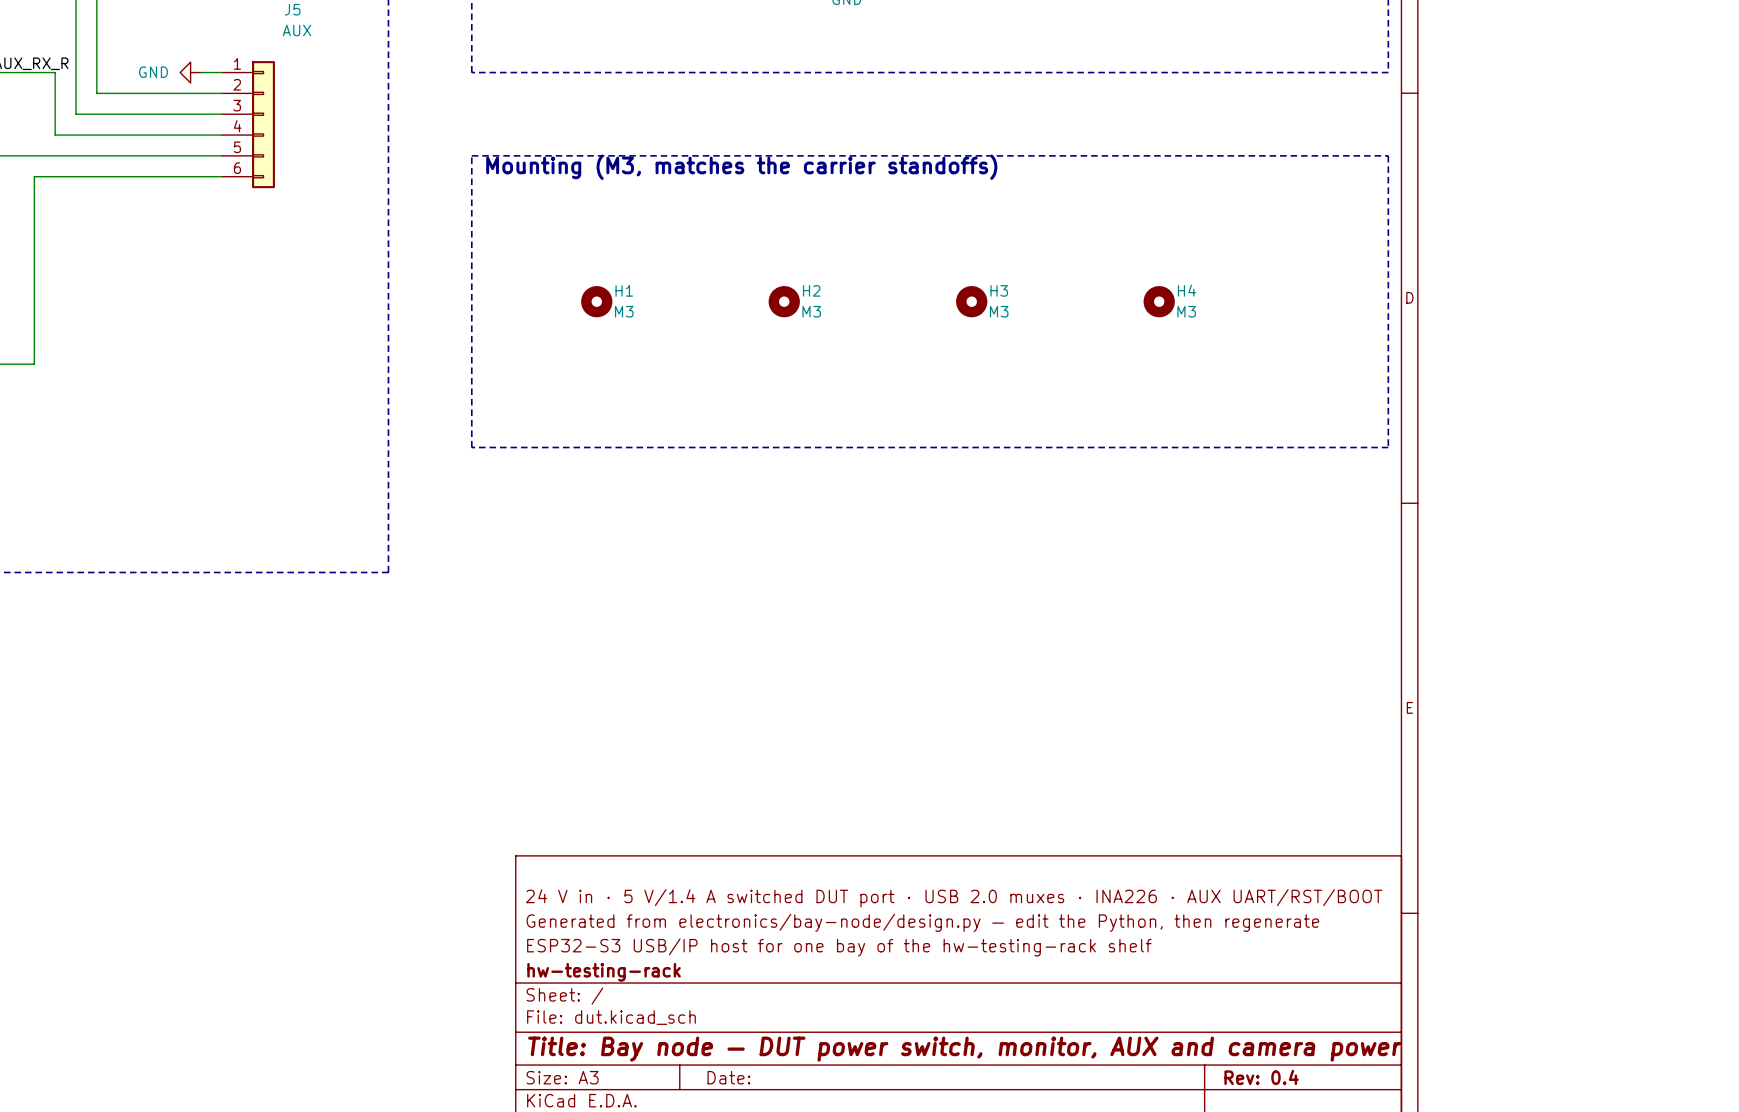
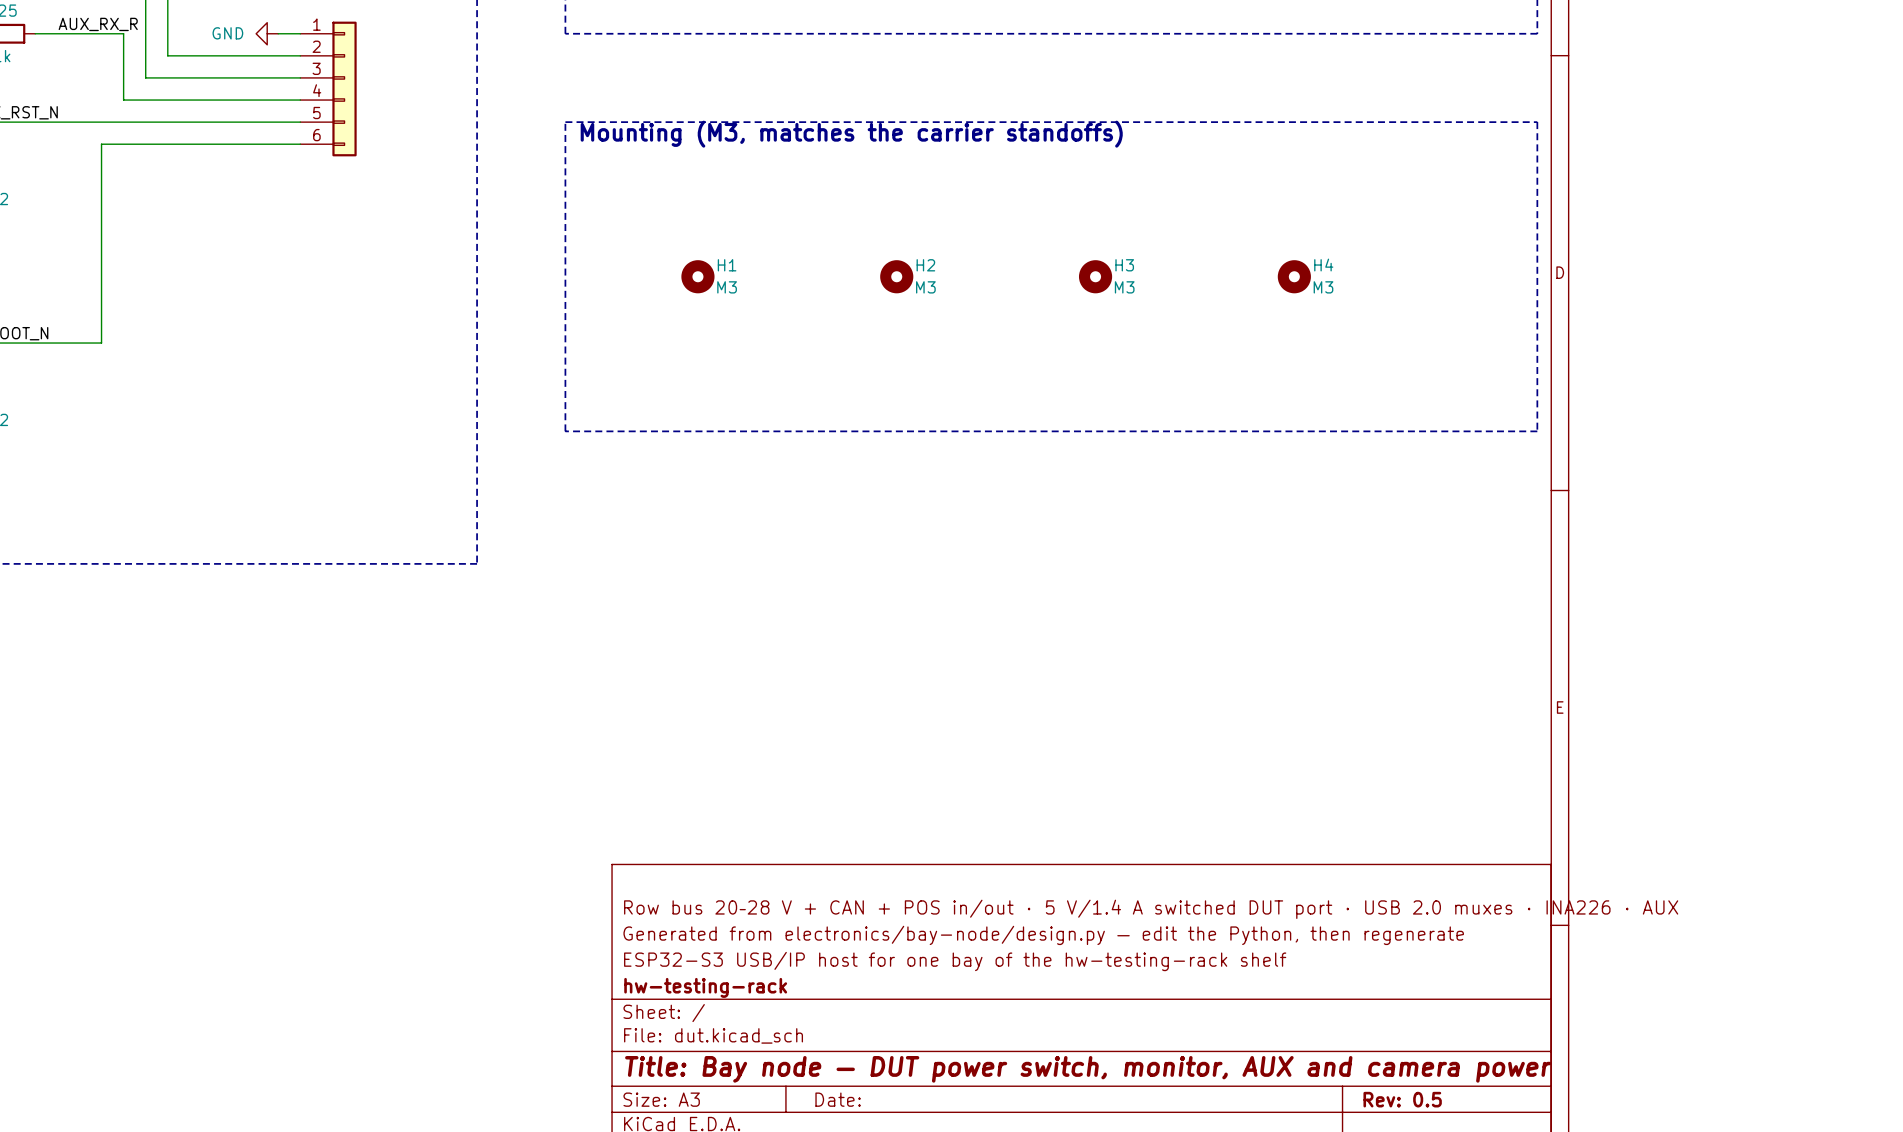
title block: 24 V in · 5 V/1.4 A switched DUT port · USB 2.0 muxes · INA226 · AUX UART/RST/BOOT (954, 898) -> Row bus 20–28 V + CAN + POS in/out · 5 V/1.4 A switched DUT port · USB 2.0 muxes · INA226 · AUX (1151, 909)
title block: Rev: 0.4 (1261, 1077) -> Rev: 0.5 (1402, 1099)

